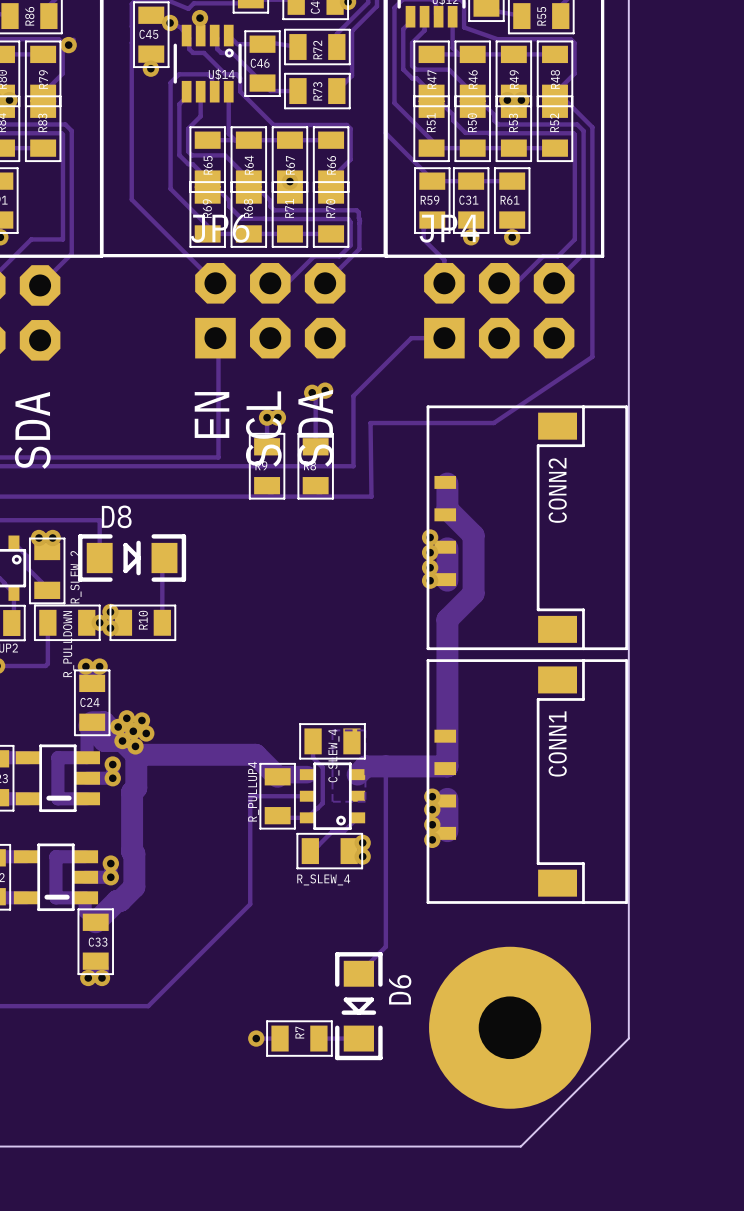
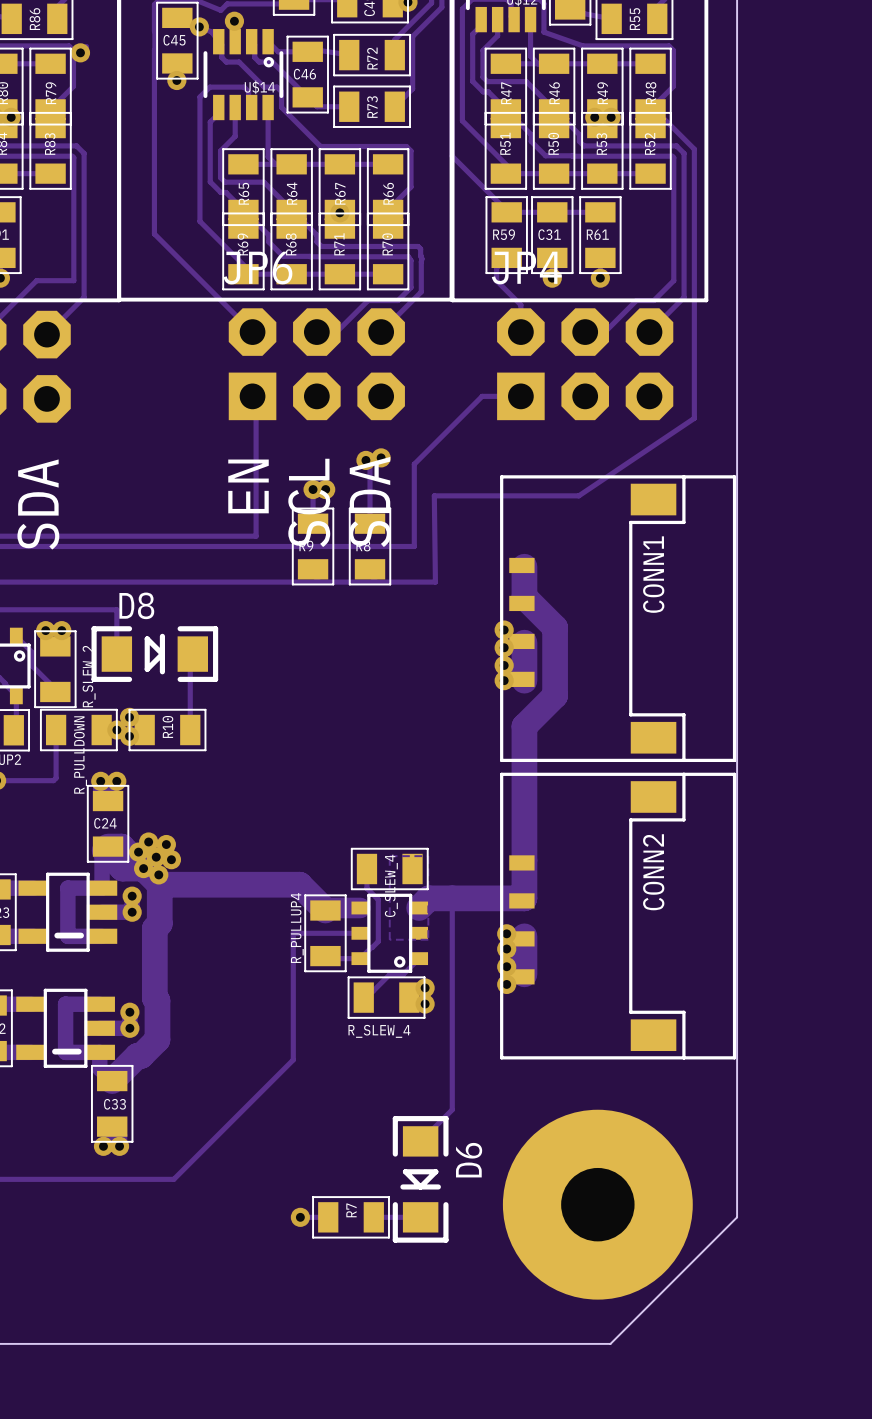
CONN2 name: CONN2 (557, 490) -> CONN1 (653, 574)
CONN1 name: CONN1 (557, 743) -> CONN2 (653, 872)

